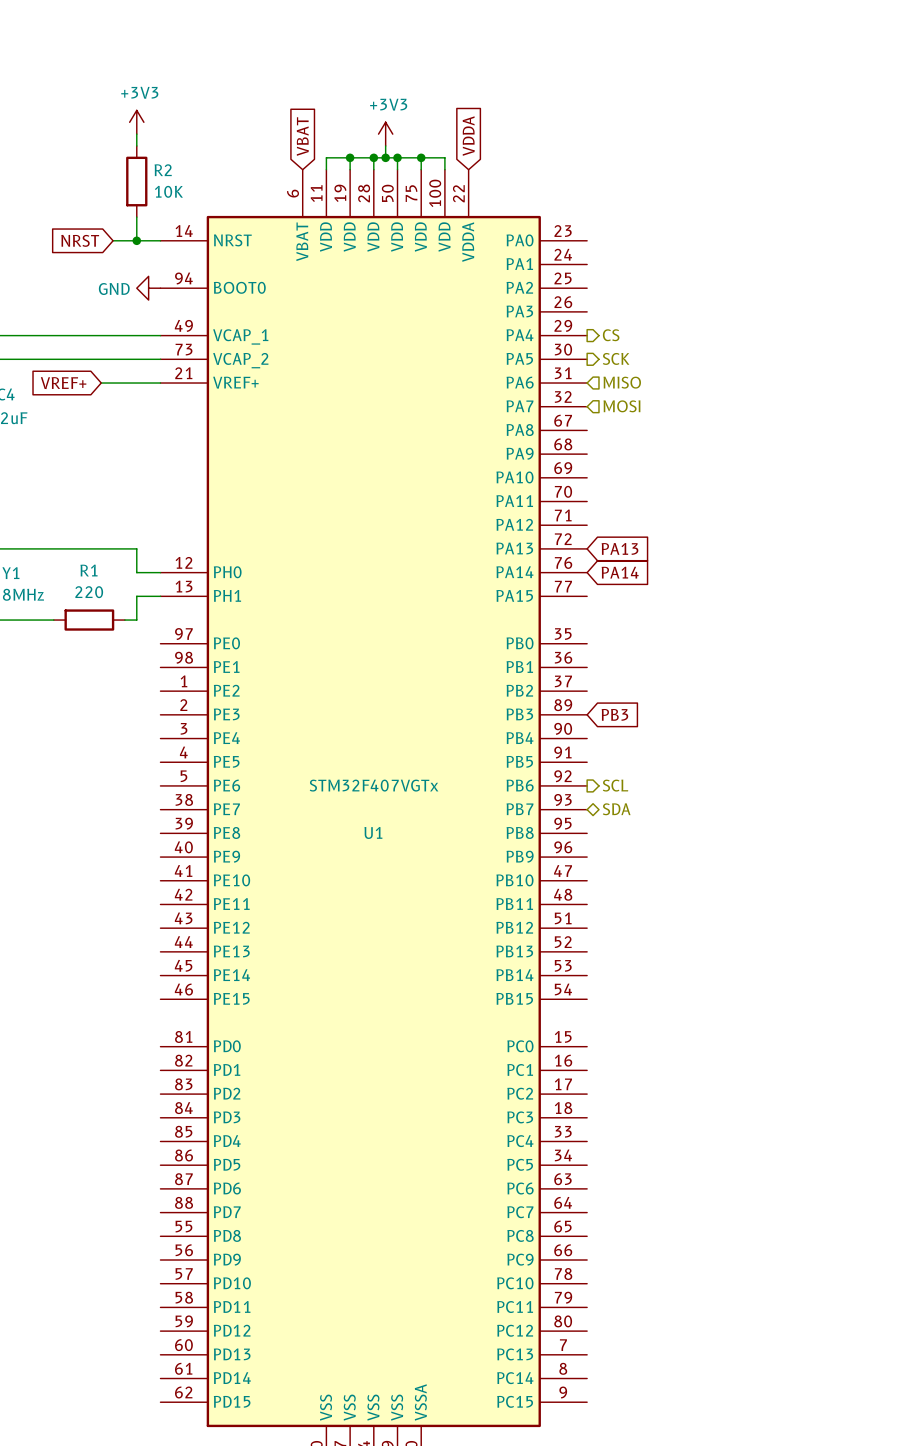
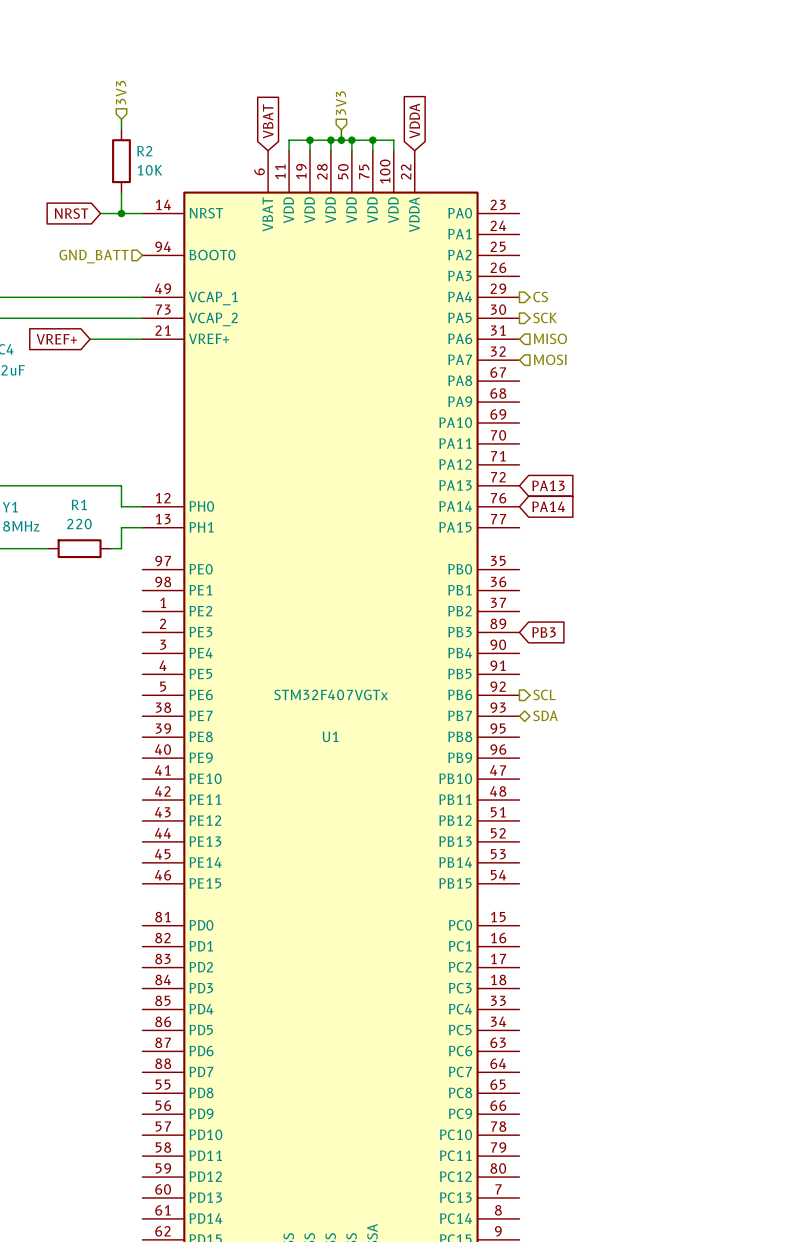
hierarchical label: none -> 3V3 (121, 92)
hierarchical label: none -> 3V3 (341, 103)
power symbol: +3V3 (136, 122) -> none
power symbol: +3V3 (385, 134) -> none
power symbol: GND (148, 288) -> none
hierarchical label: none -> GND_BATT (94, 256)

